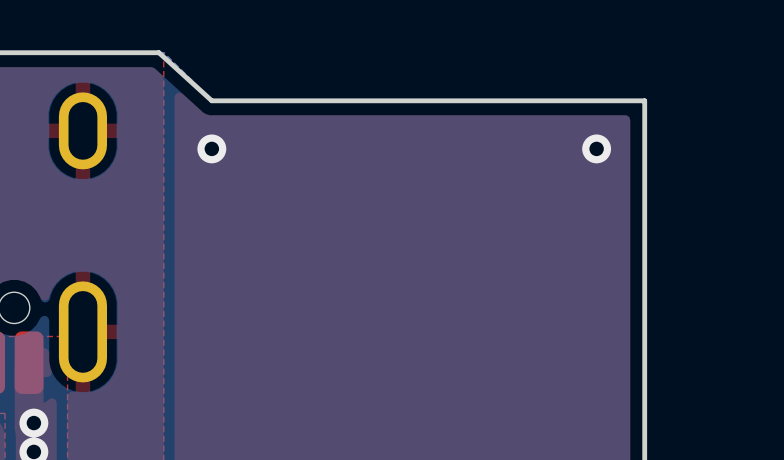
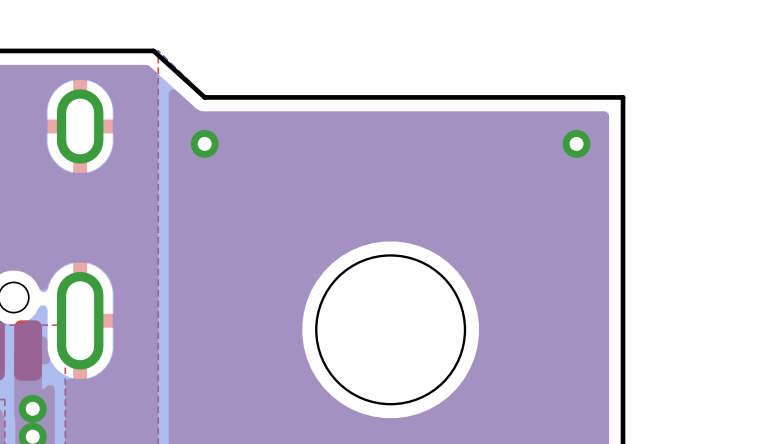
round board edge: none -> [315, 254, 467, 406]

